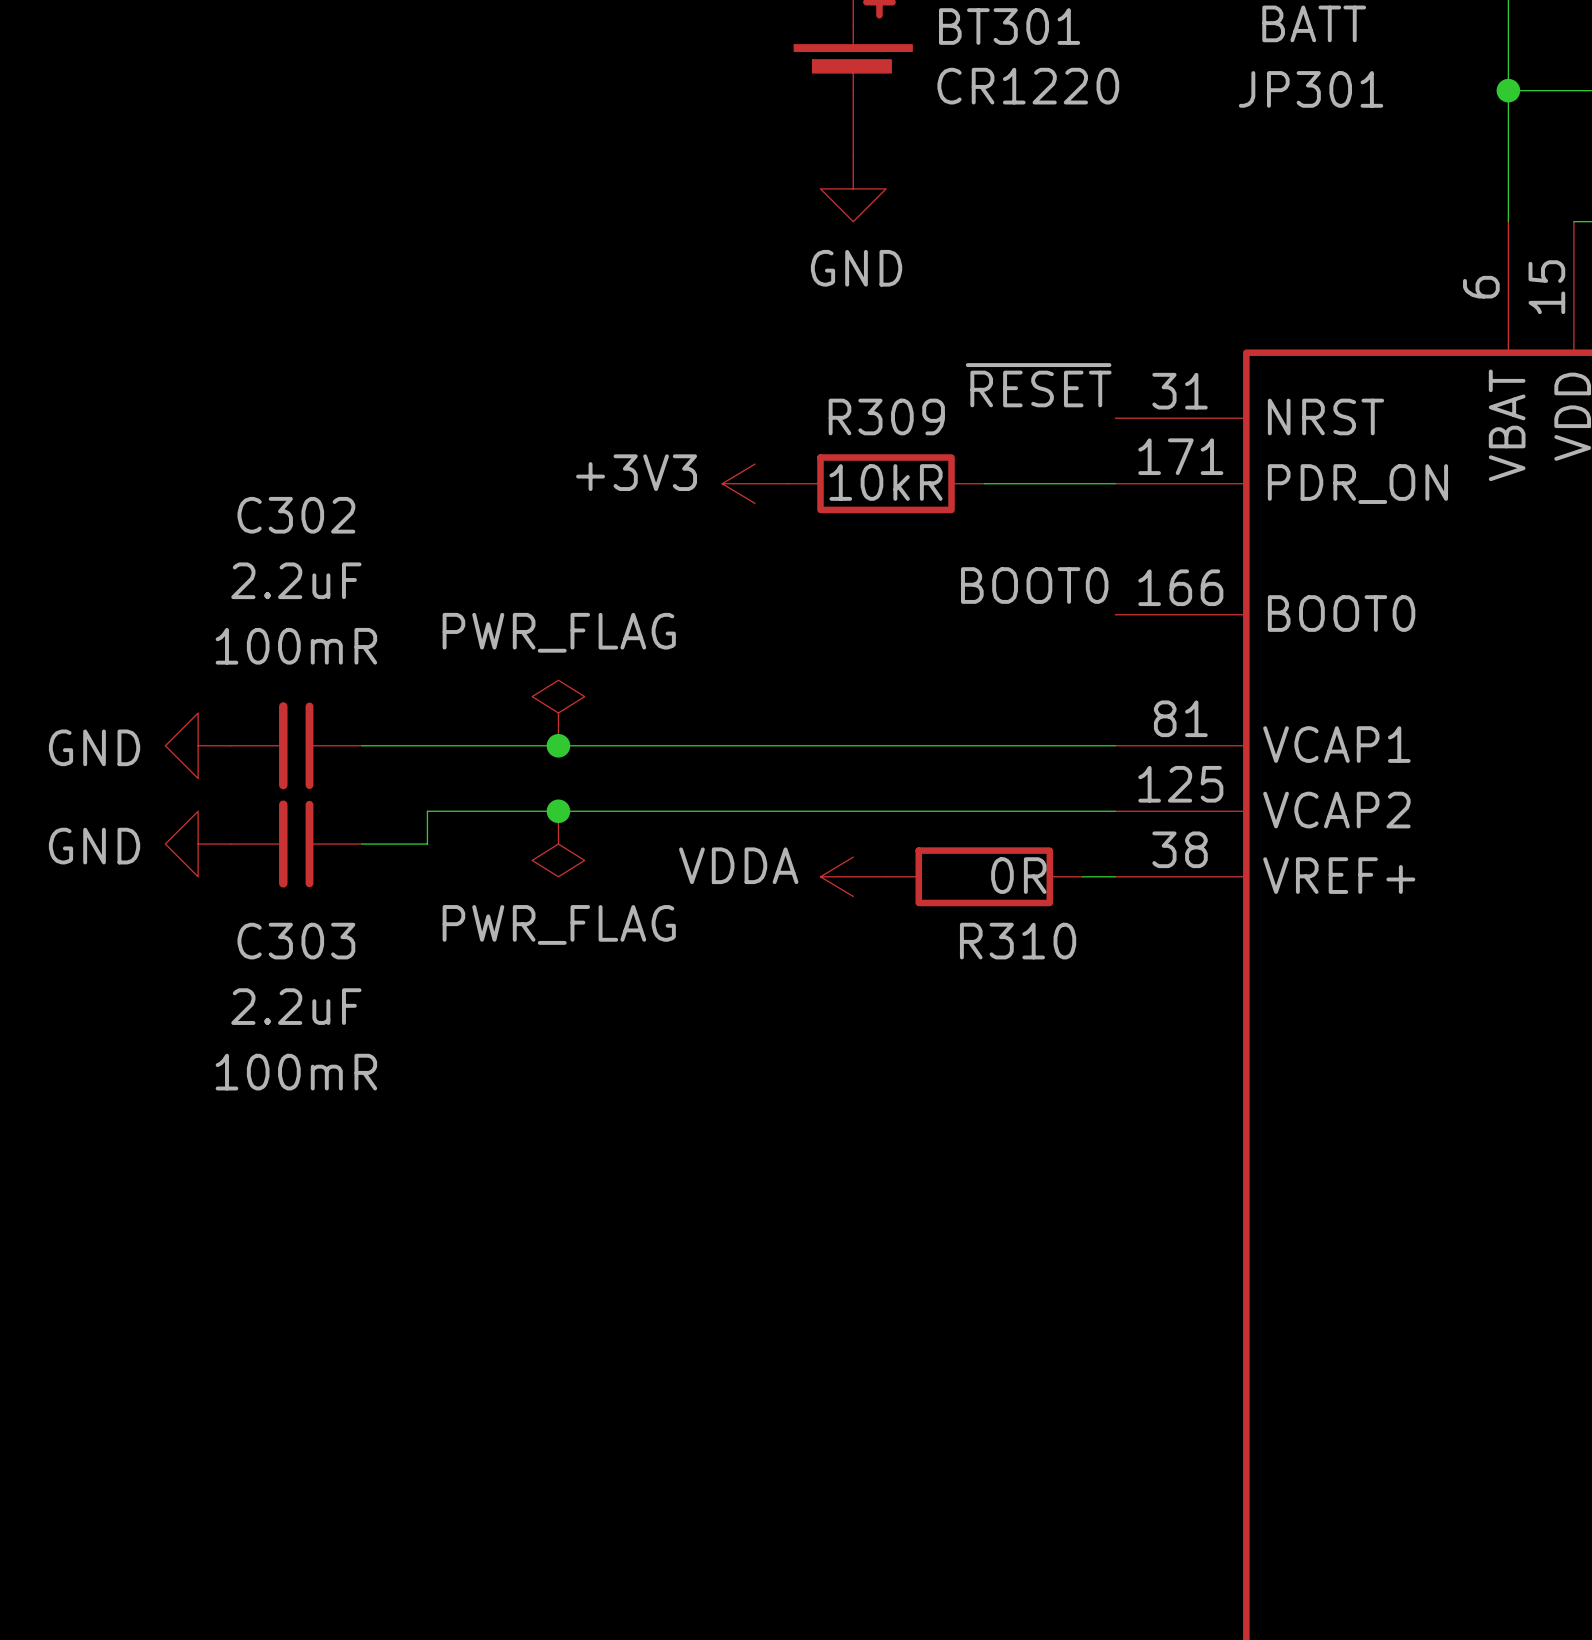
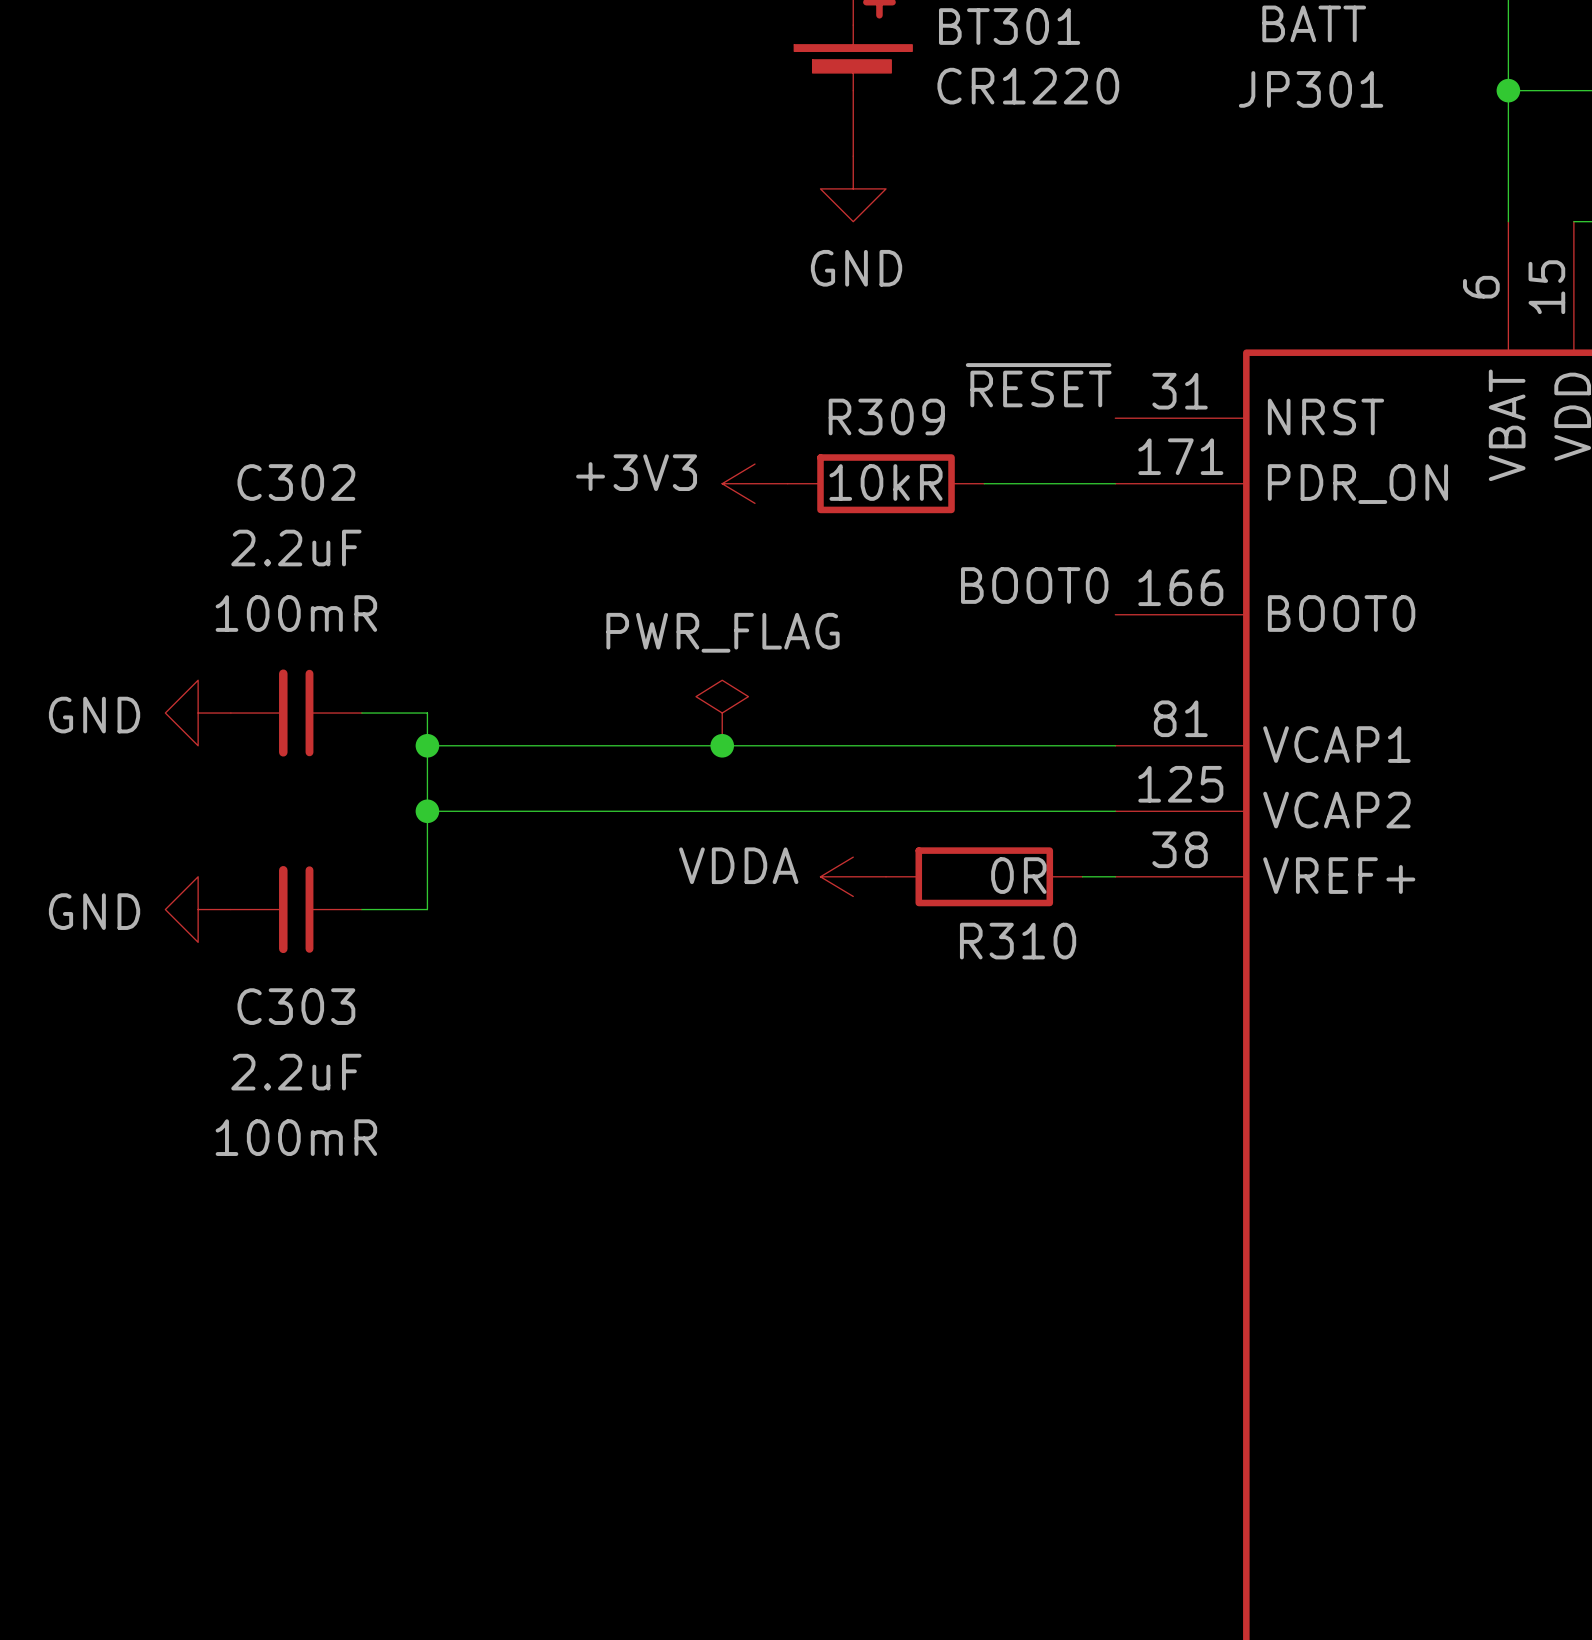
wire: none -> (361, 713) (427, 713) (427, 811)
power symbol: PWR_FLAG (558, 713) -> none
power symbol: none -> PWR_FLAG (722, 713)
power symbol position: GND (198, 745) -> GND (198, 713)
C302 position: (296, 745) -> (296, 713)
wire: (361, 745) (427, 745) -> none
junction: none -> (427, 745)
junction: (558, 745) -> none
junction: none -> (722, 745)
junction: none -> (427, 811)
junction: (558, 811) -> none
power symbol: GND (198, 844) -> none
C303 position: (296, 844) -> (296, 909)
wire: (361, 844) (427, 844) -> (361, 909) (427, 909) (427, 844)
power symbol: PWR_FLAG (558, 844) -> none
power symbol: none -> GND (198, 909)

